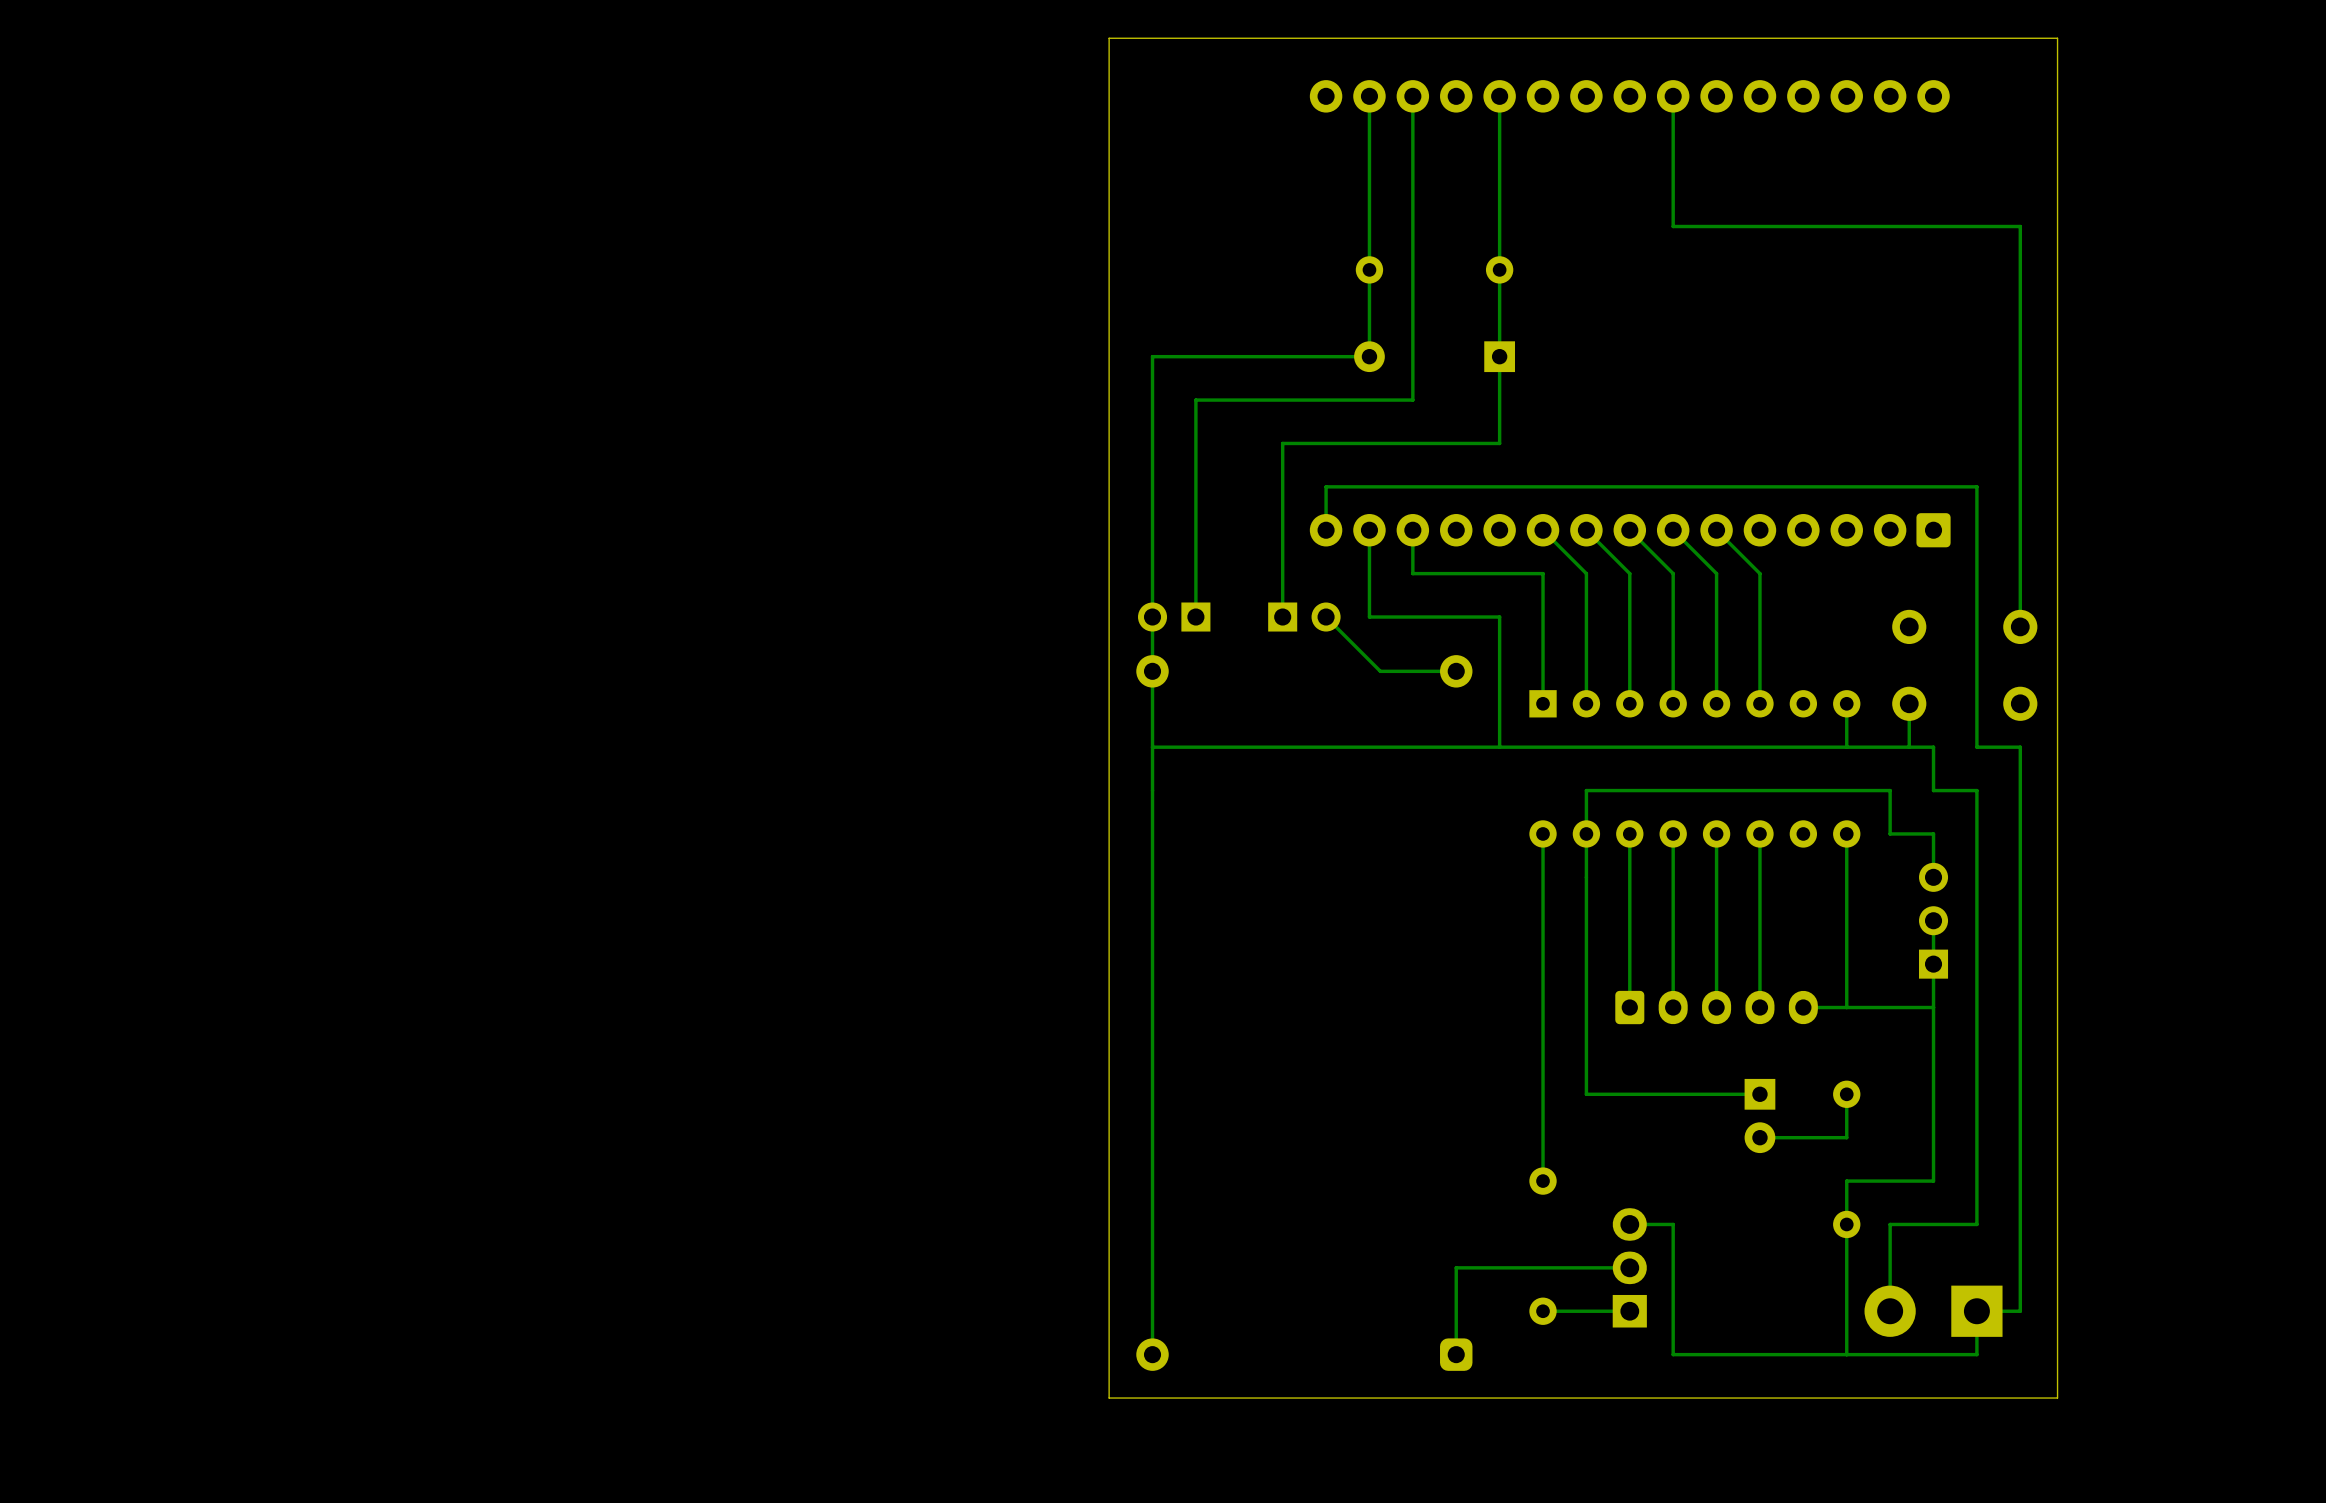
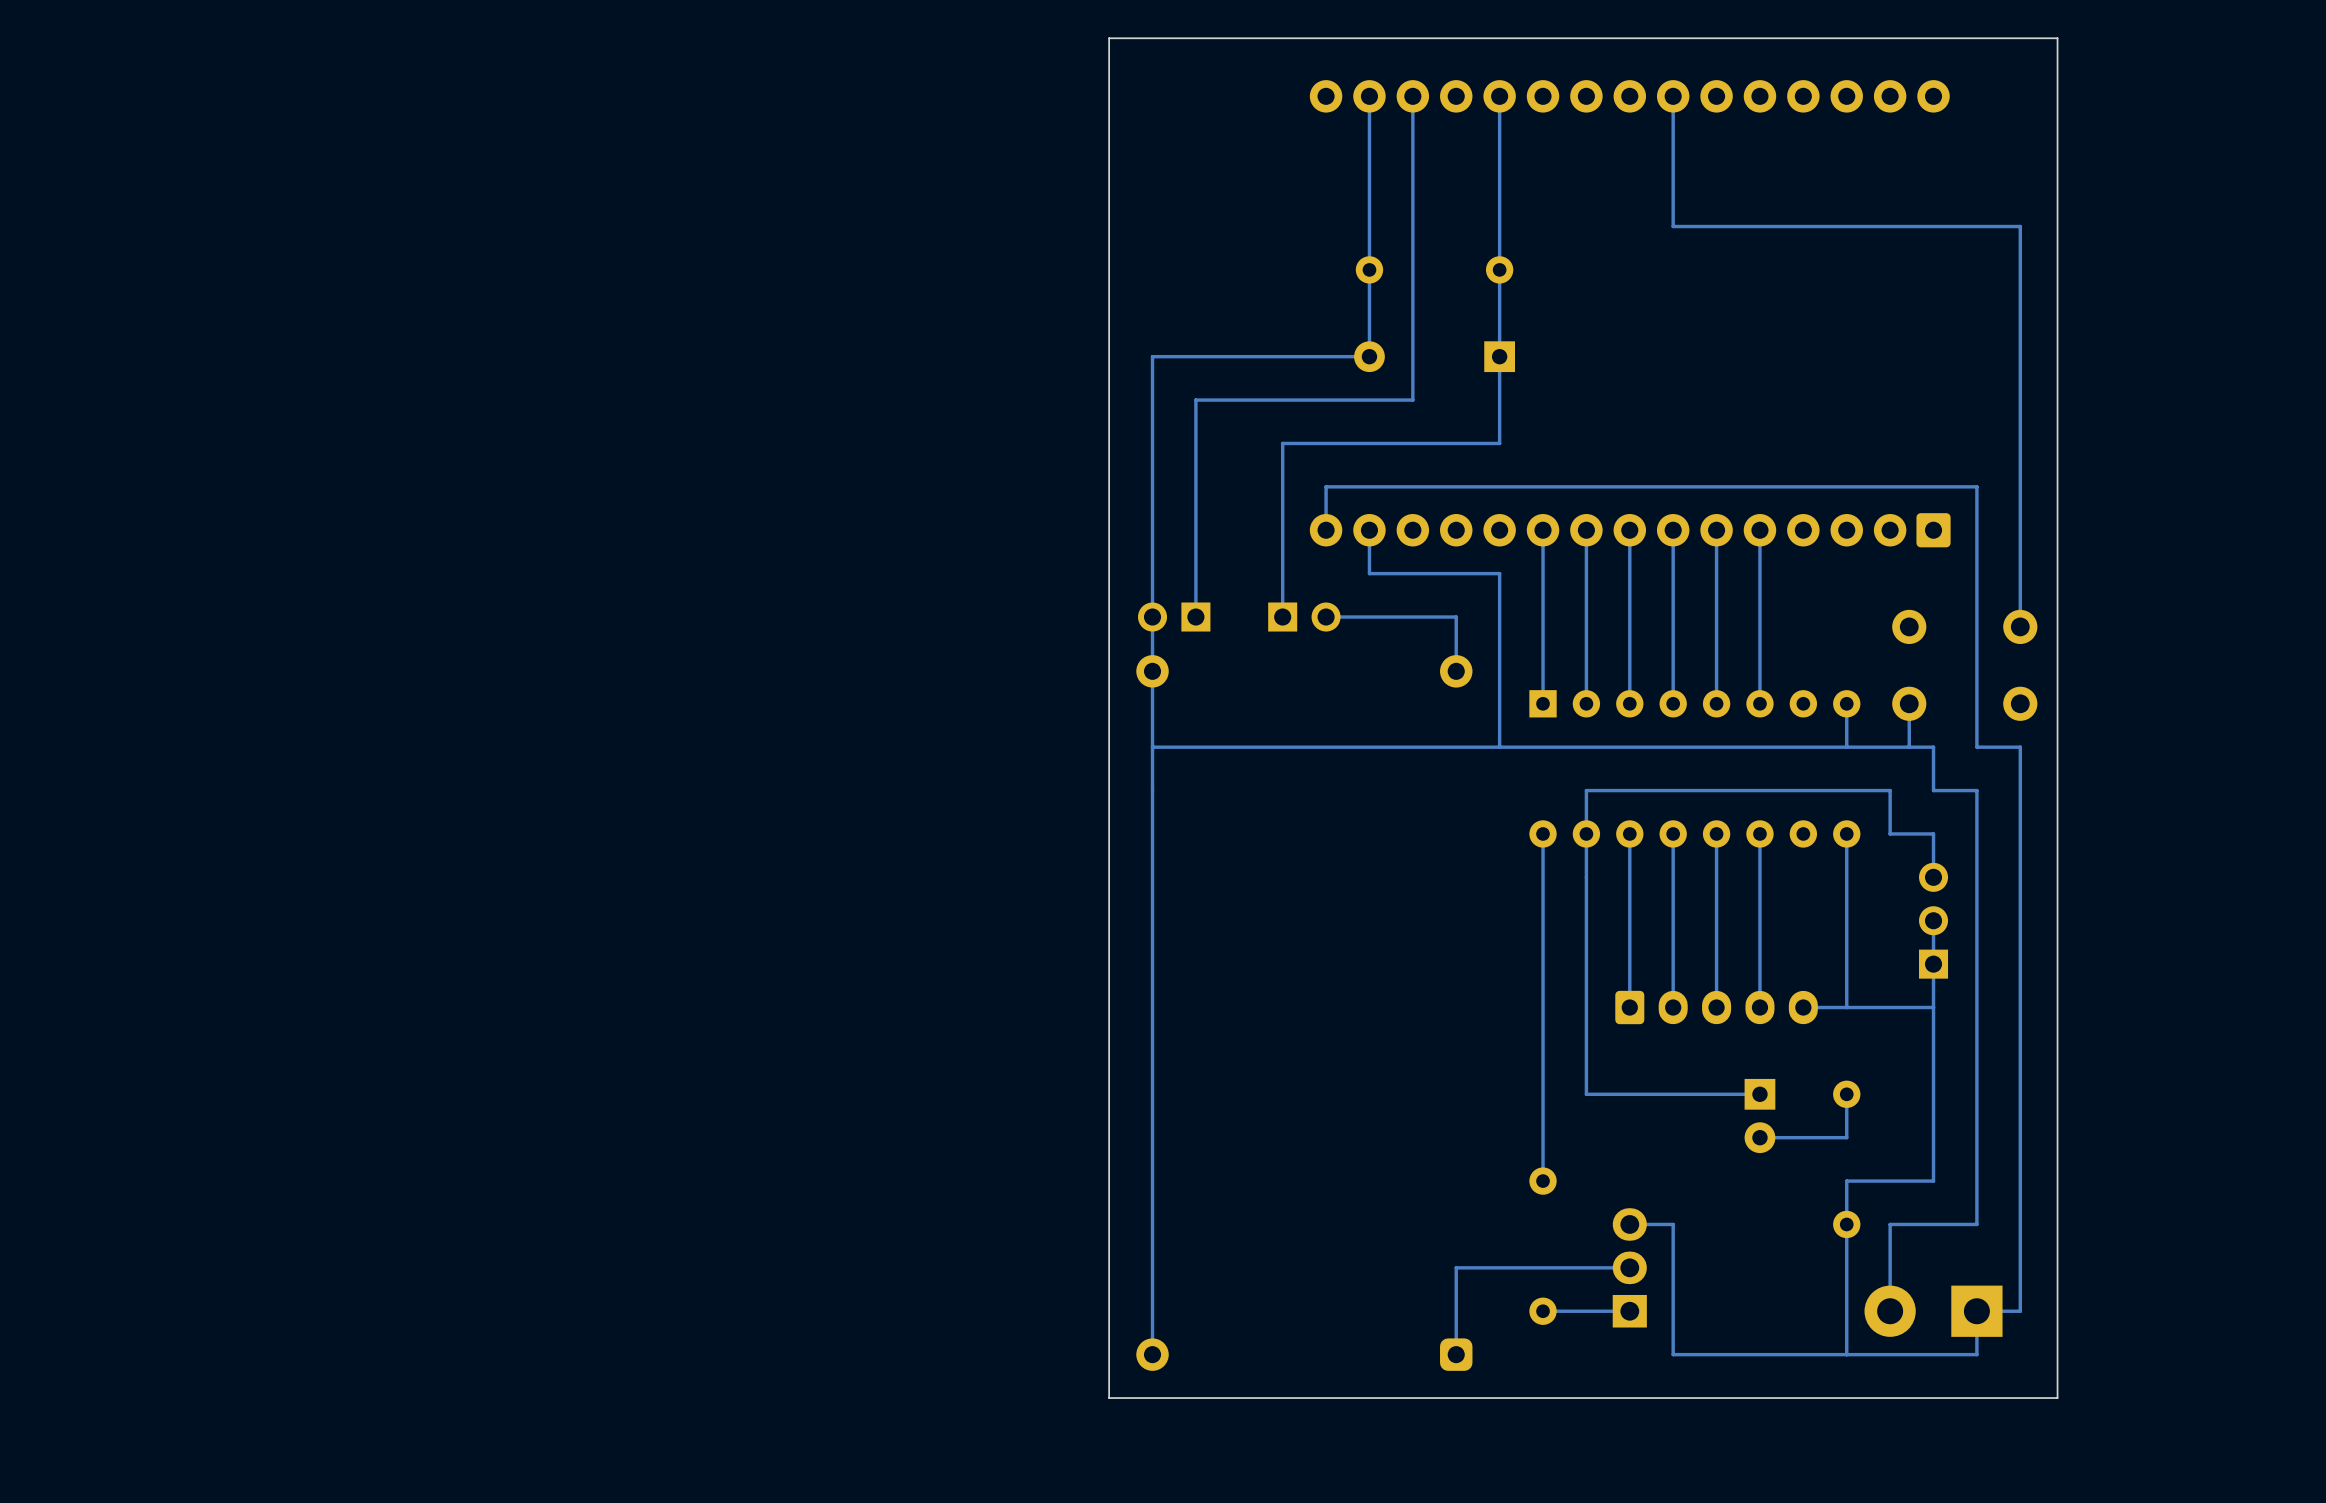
track: (1412, 530) (1412, 573) -> (1369, 573) (1412, 573)
track: (1543, 530) (1586, 573) -> (1586, 530) (1586, 573)
track: none -> (1543, 530) (1543, 573)
track: (1586, 530) (1629, 573) -> (1629, 530) (1629, 573)
track: (1629, 530) (1673, 573) -> (1673, 530) (1673, 573)
track: (1673, 530) (1716, 573) -> (1716, 530) (1716, 573)
track: (1716, 530) (1759, 573) -> (1759, 530) (1759, 573)
track: (1369, 573) (1369, 617) -> (1326, 617) (1369, 617)
track: (1543, 573) (1499, 573) -> (1499, 617) (1499, 573)
track: (1326, 617) (1380, 671) (1456, 671) -> none
track: (1499, 617) (1456, 617) -> (1456, 671) (1456, 617)

